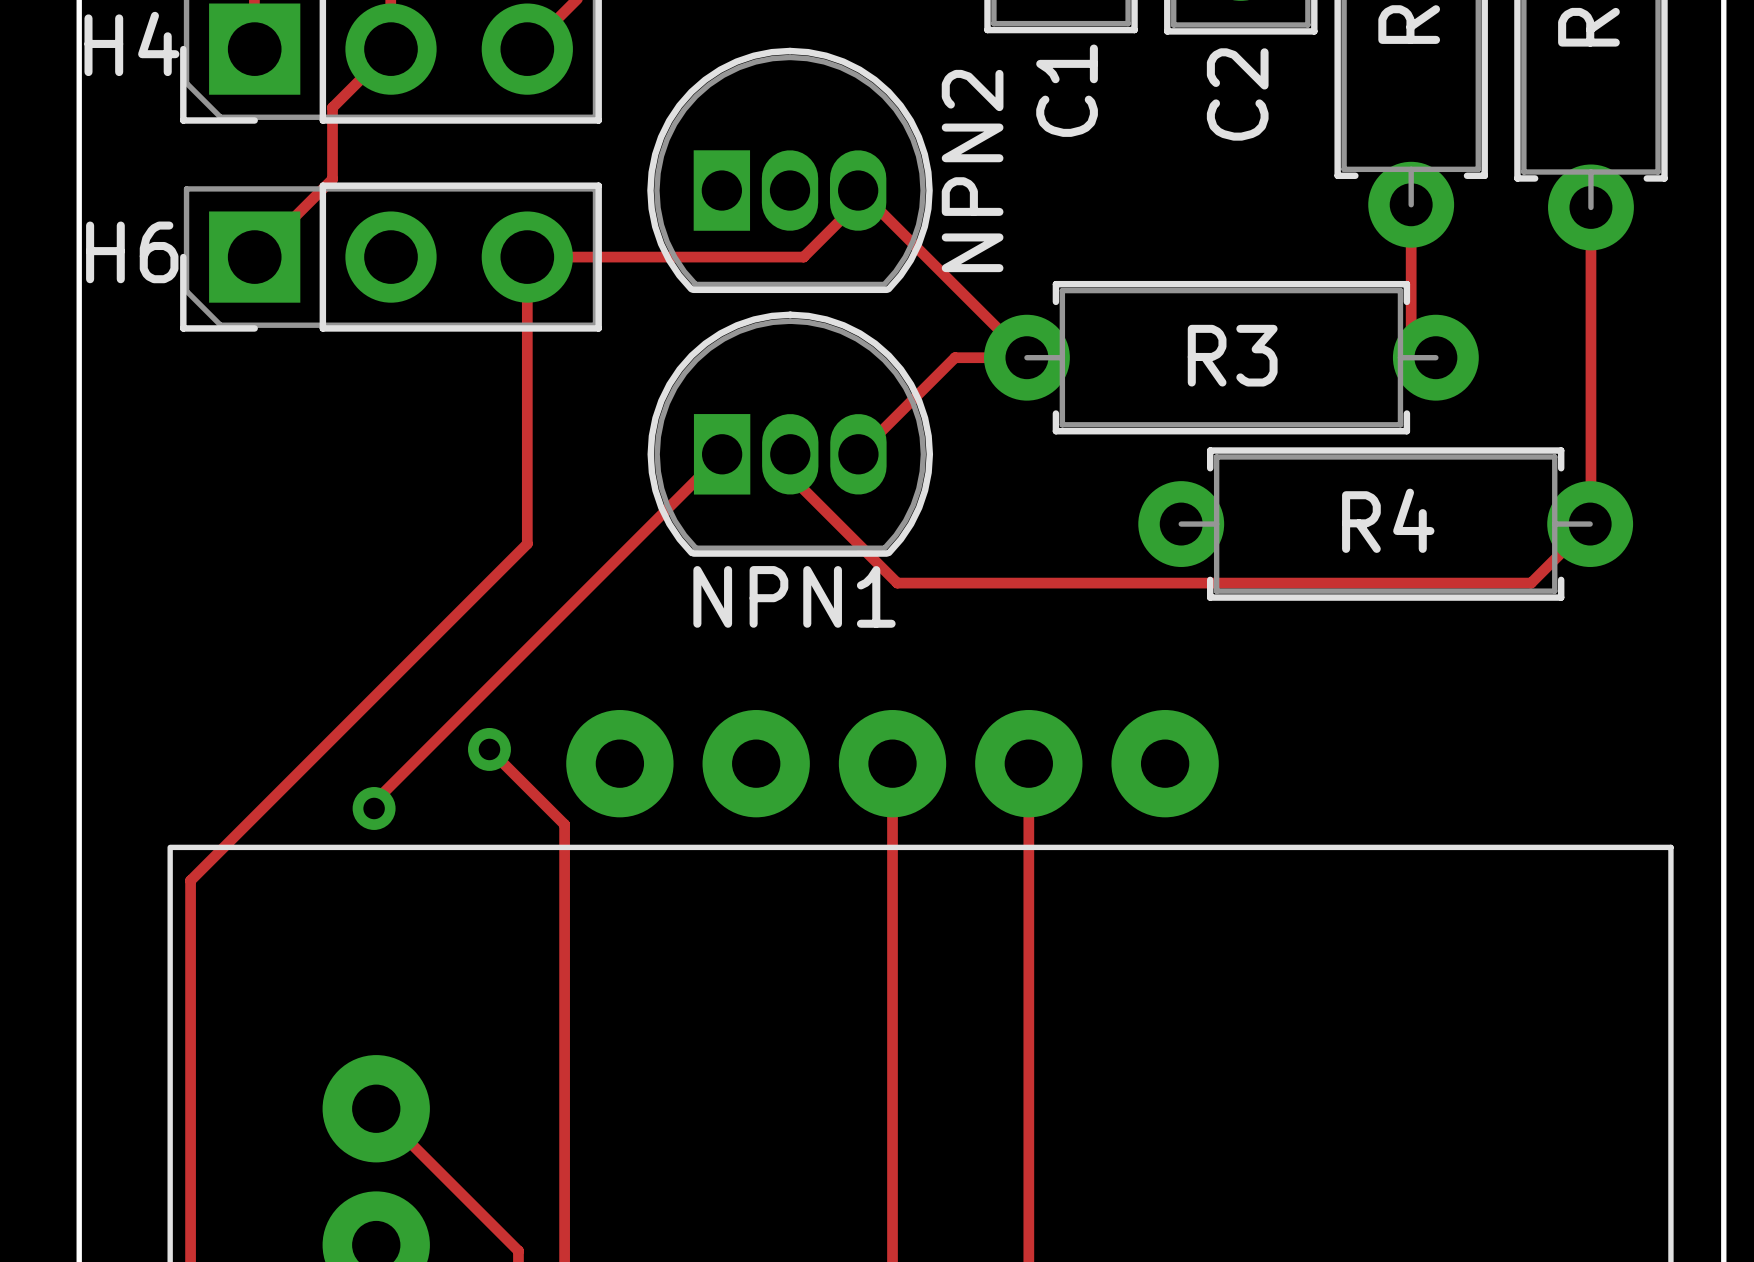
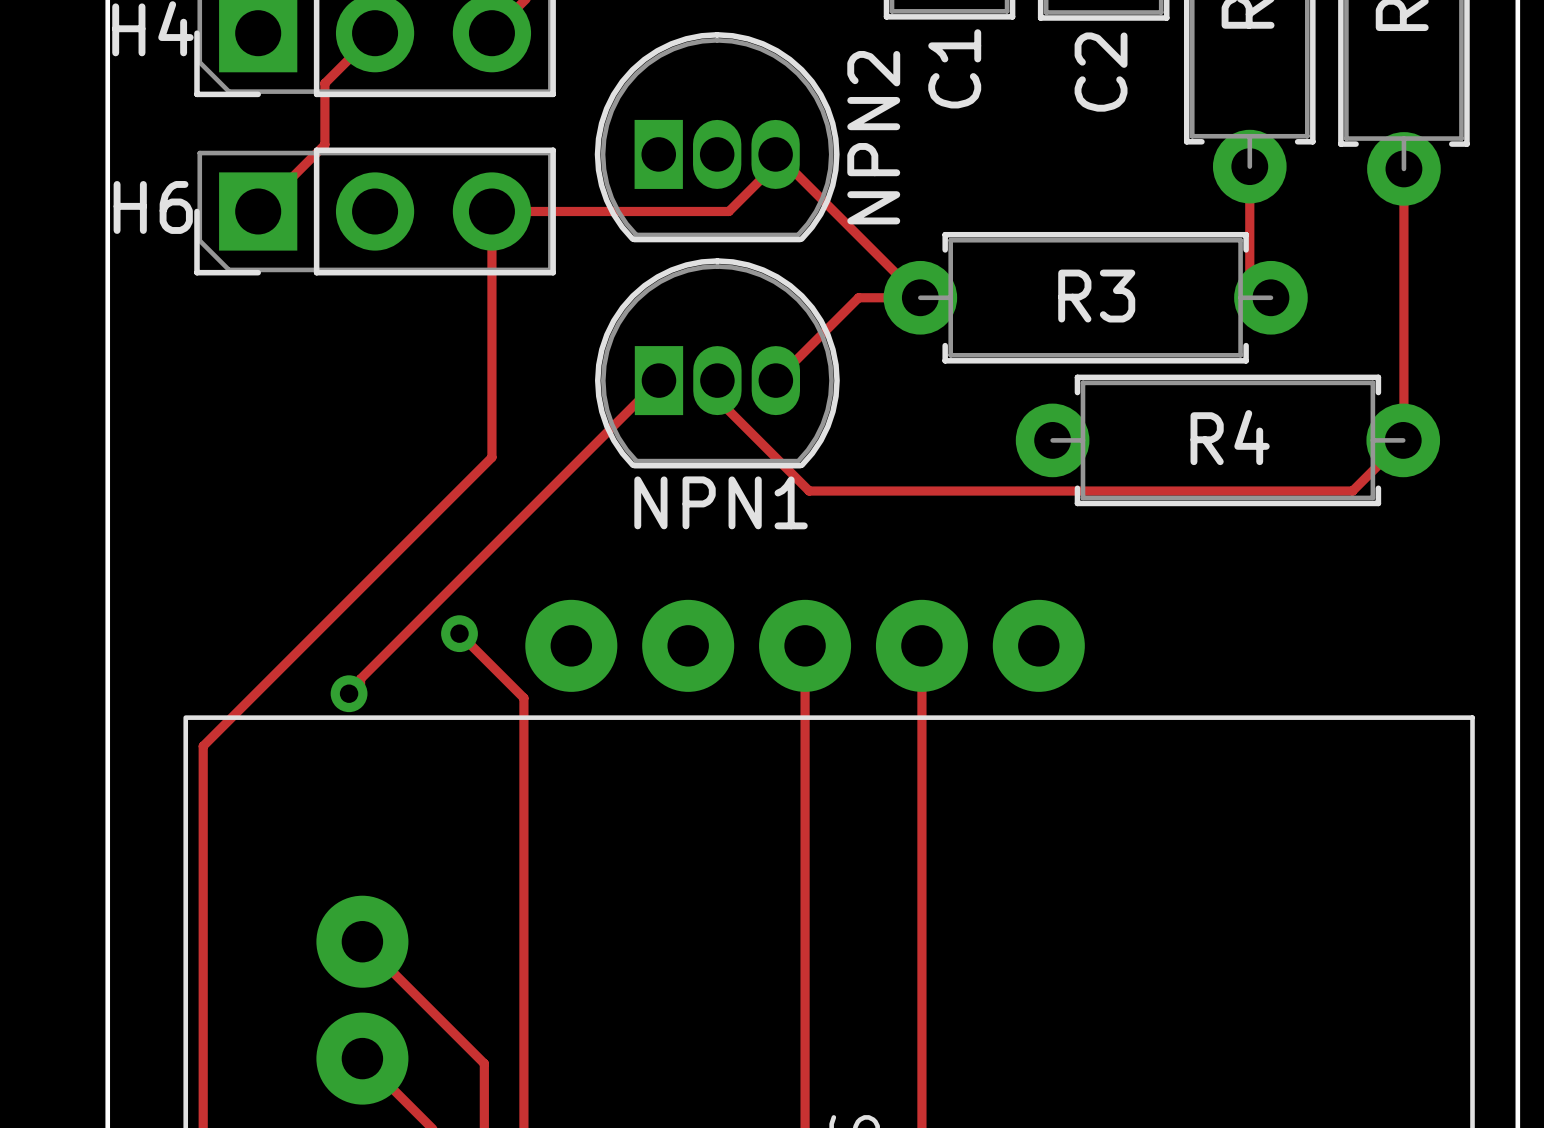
via position: (374, 808) -> (349, 693)

